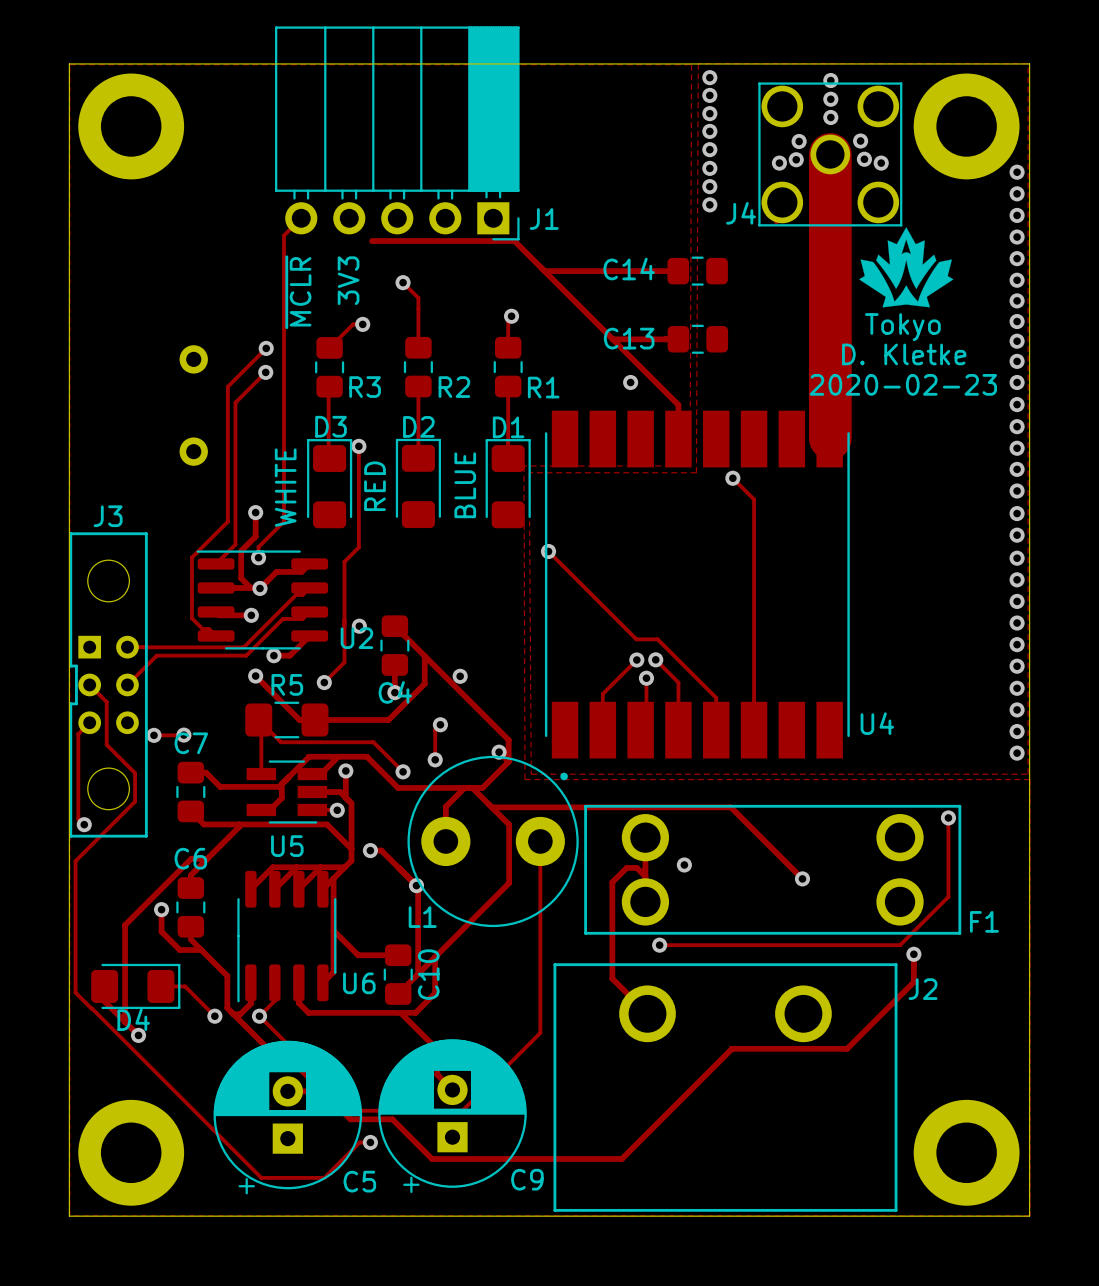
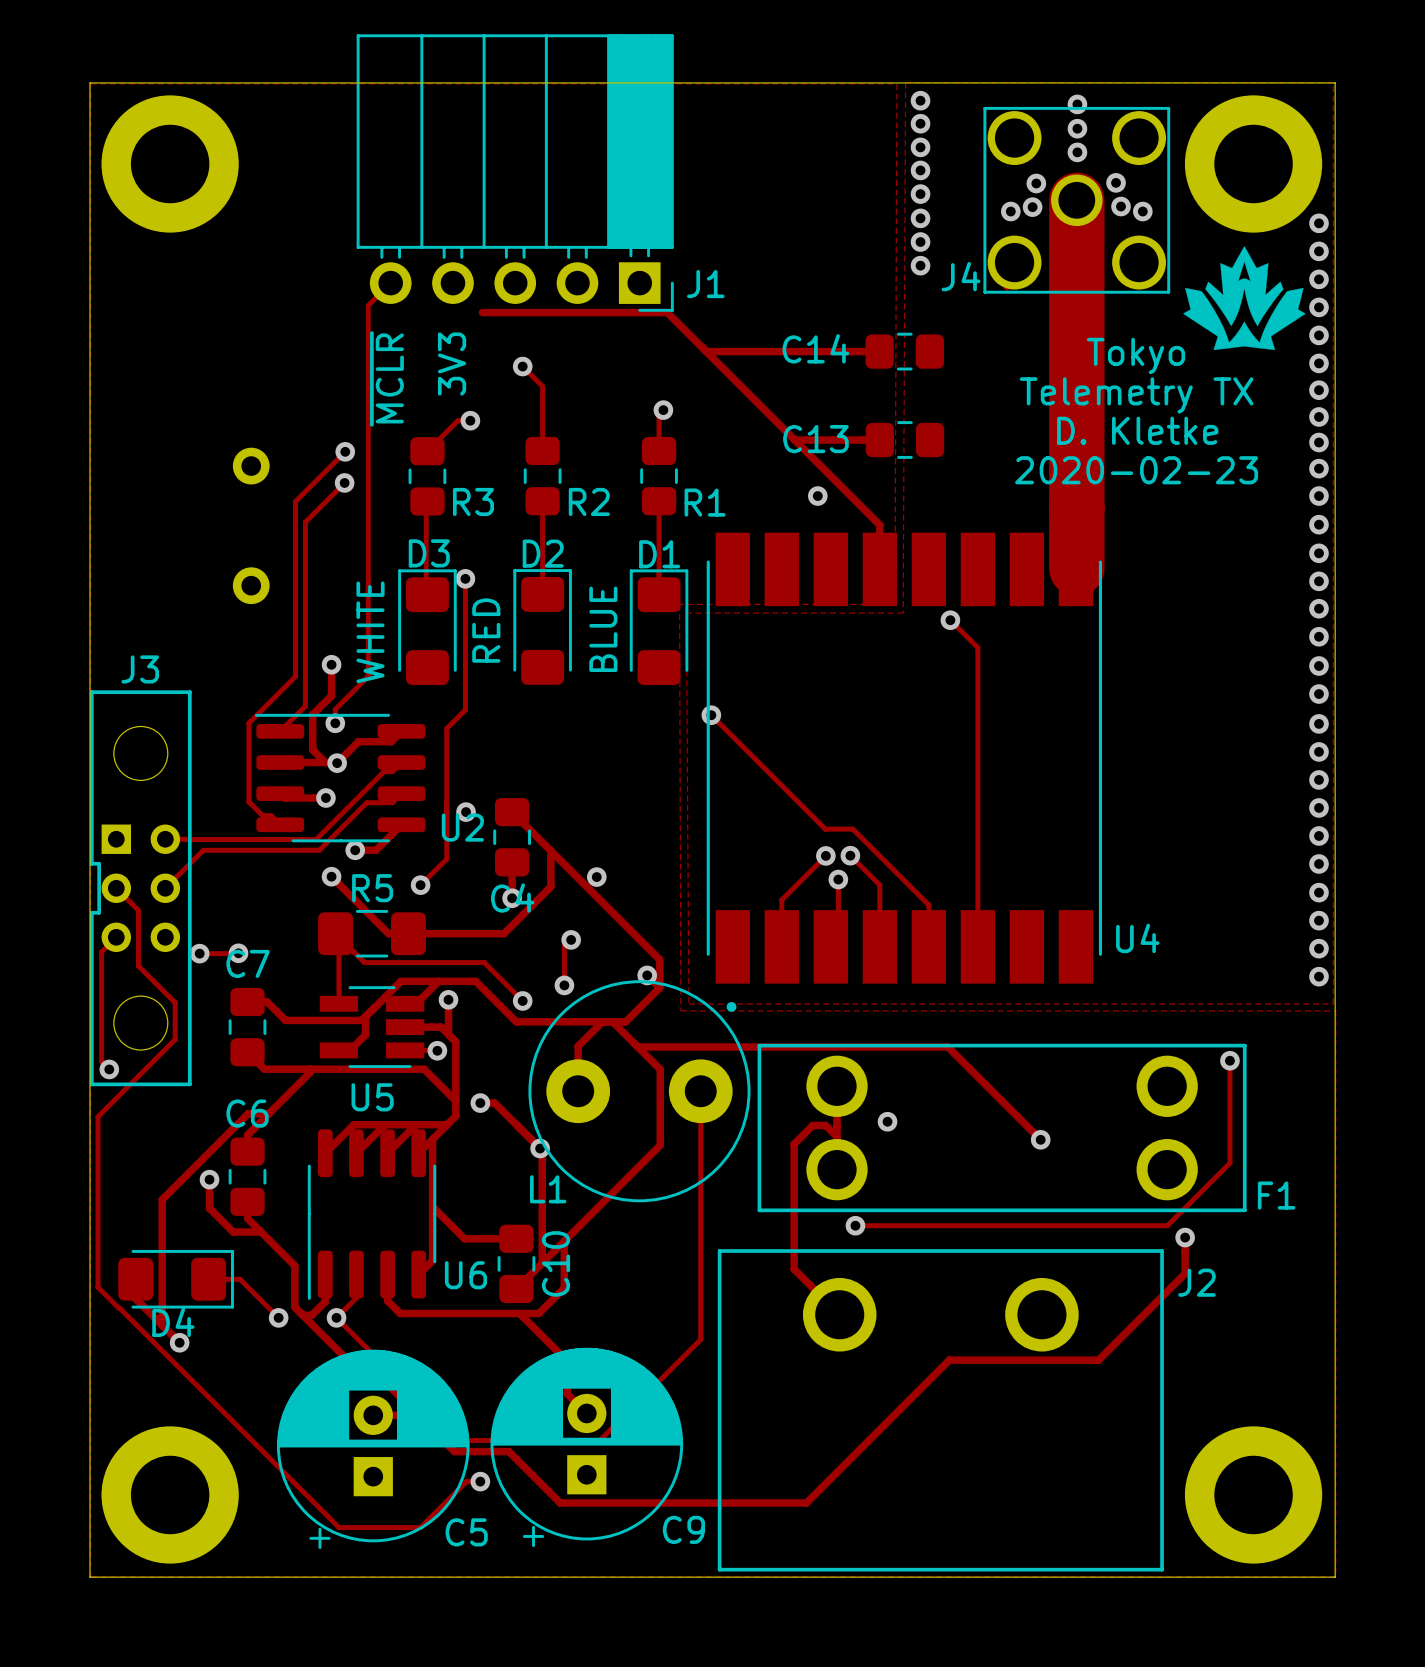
drawing position: (906, 267) -> (1244, 298)
text: none -> Telemetry TX (1136, 395)
text position: Tokyo (902, 327) -> Tokyo (1136, 355)
text position: D. Kletke (904, 354) -> D. Kletke (1137, 430)
text position: 2020-02-23 (903, 384) -> 2020-02-23 (1136, 470)

